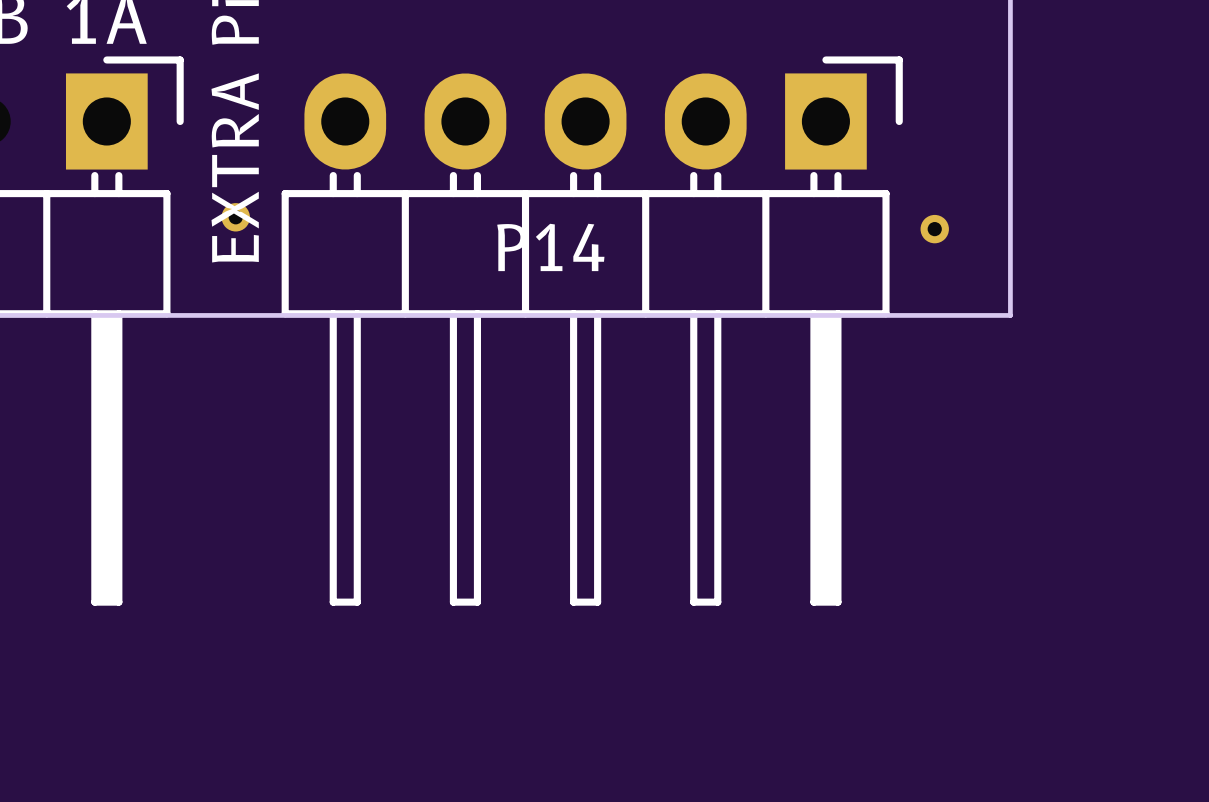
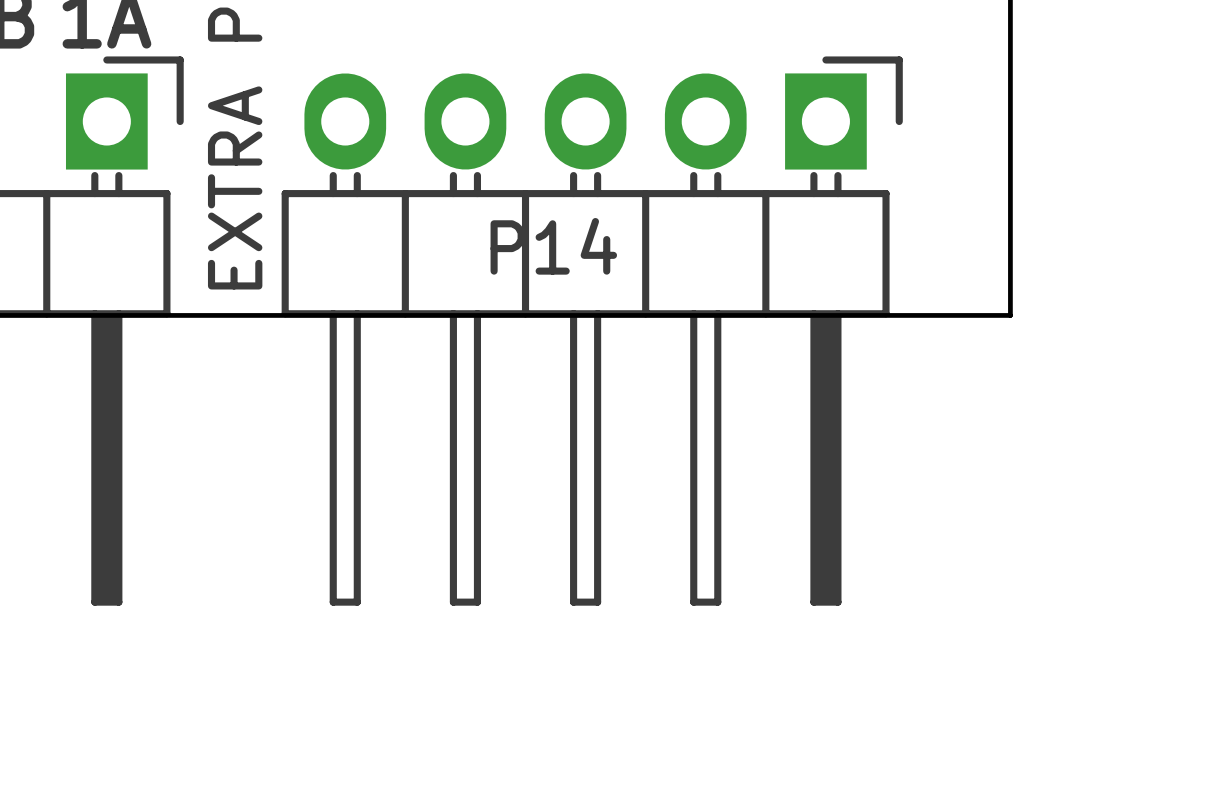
part: (235, 217) -> none
part: (934, 229) -> none

